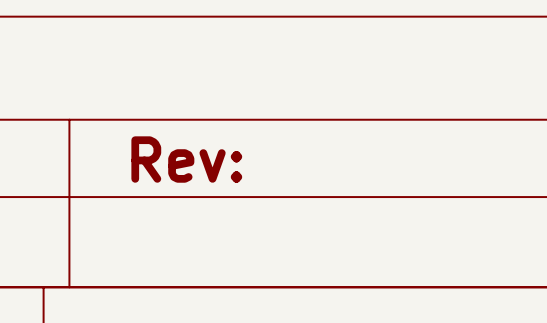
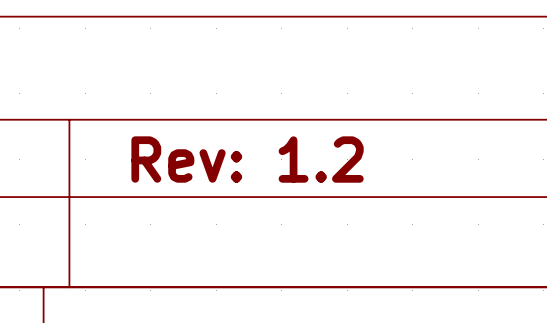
title block: Rev: (186, 159) -> Rev: 1.2 (247, 159)

